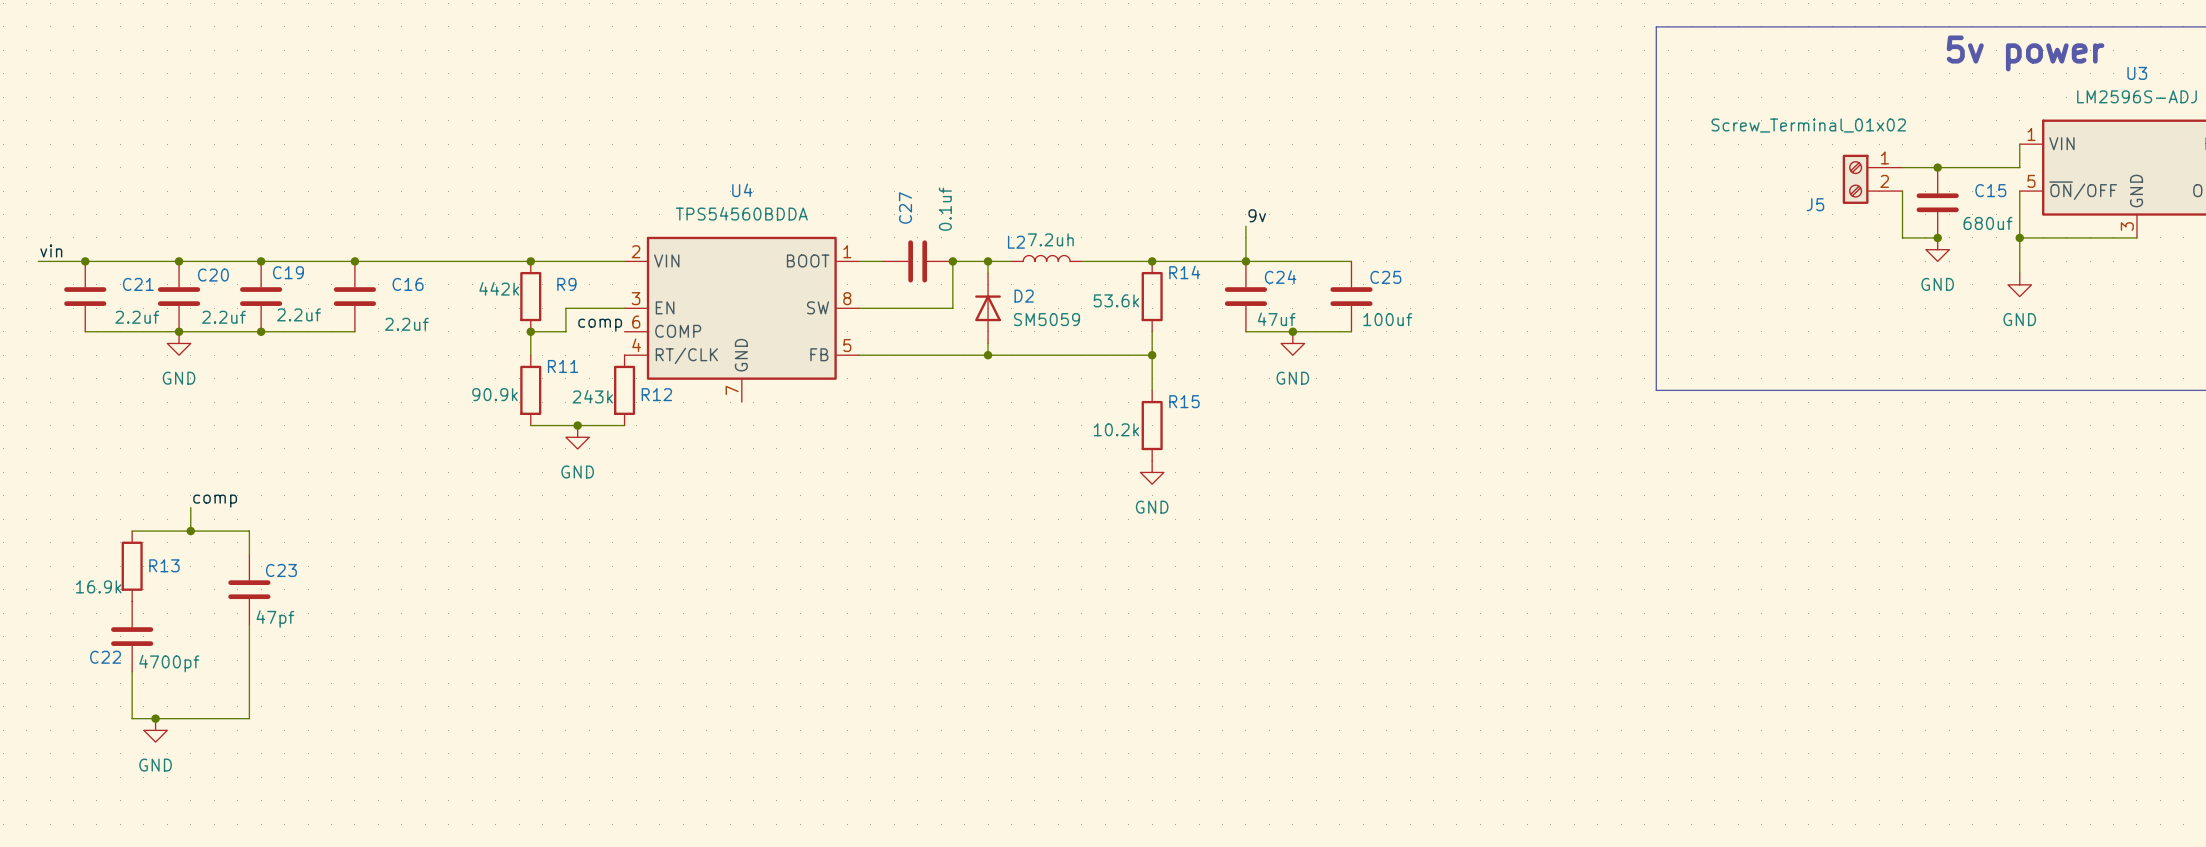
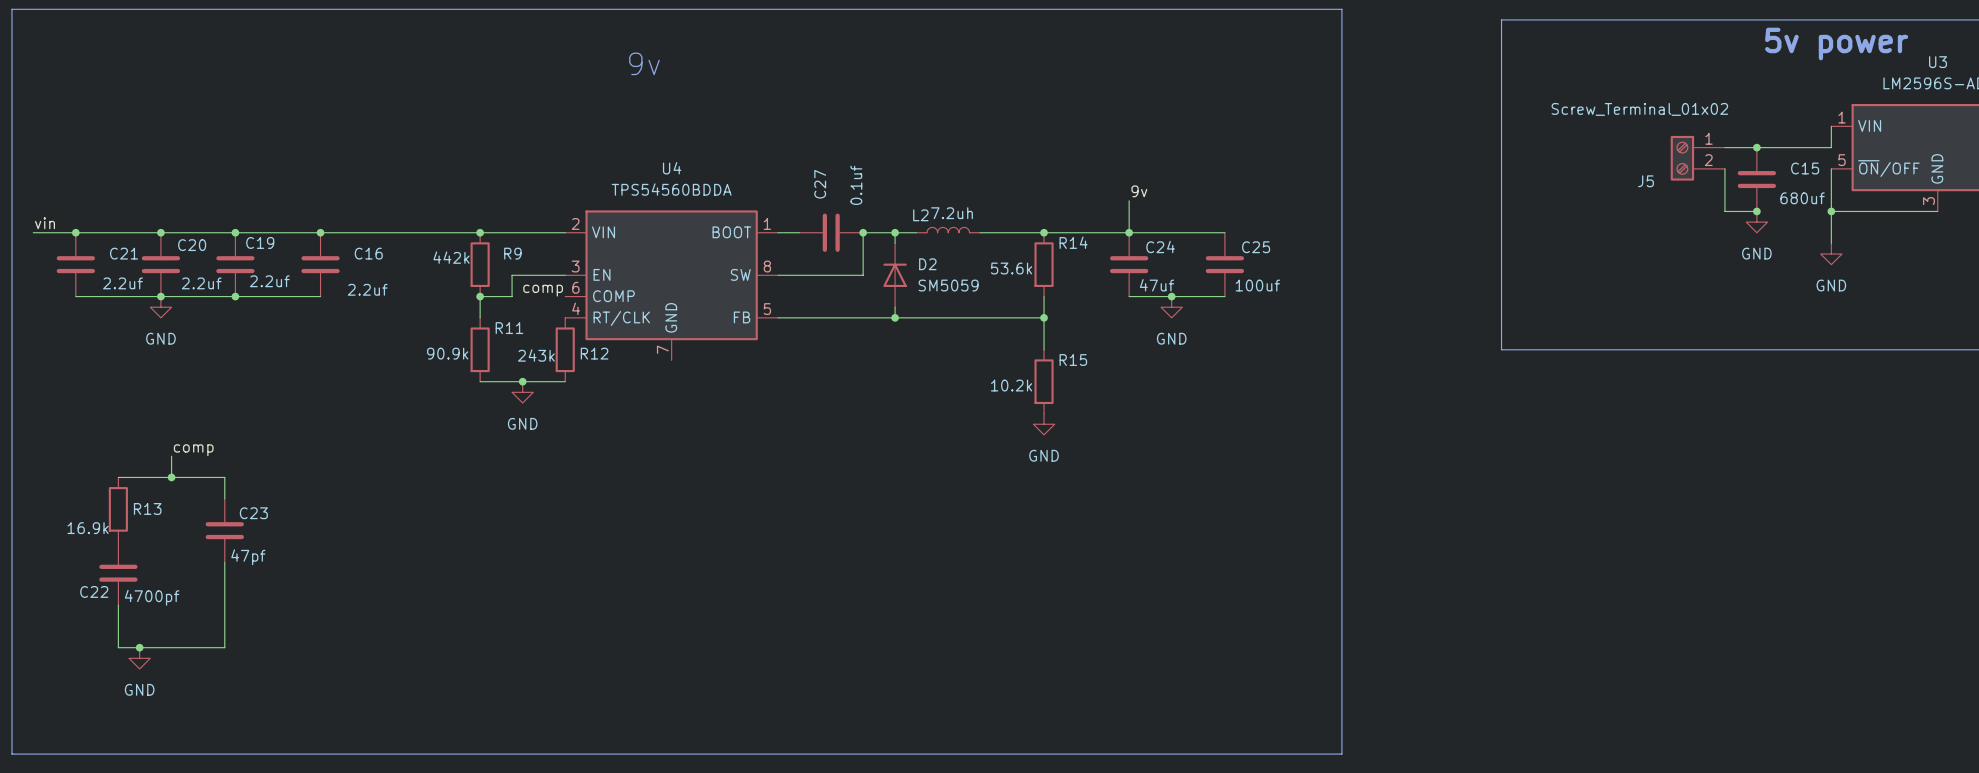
line: none -> (11, 9) (1341, 9) (1341, 754) (11, 754) (11, 9)
text: none -> 9v (644, 63)

